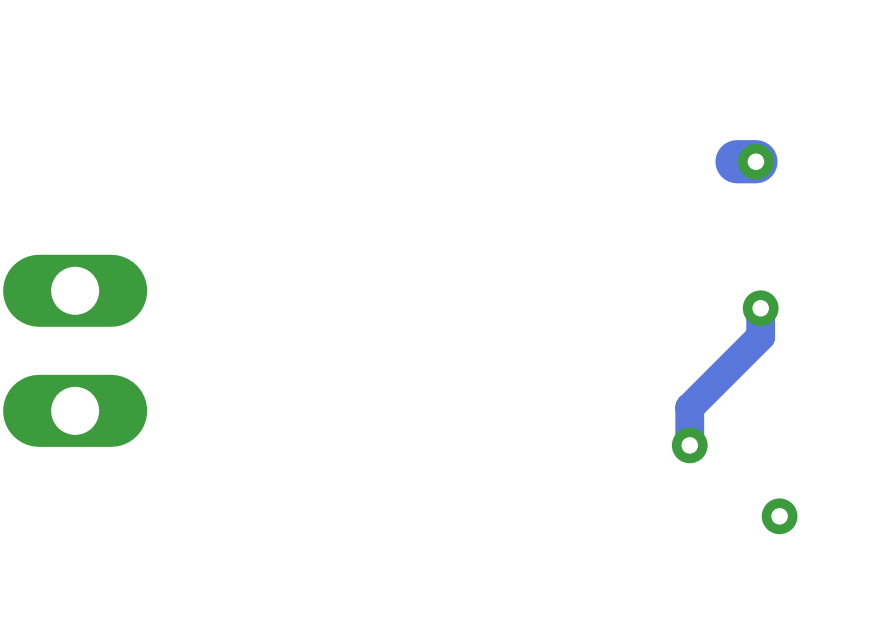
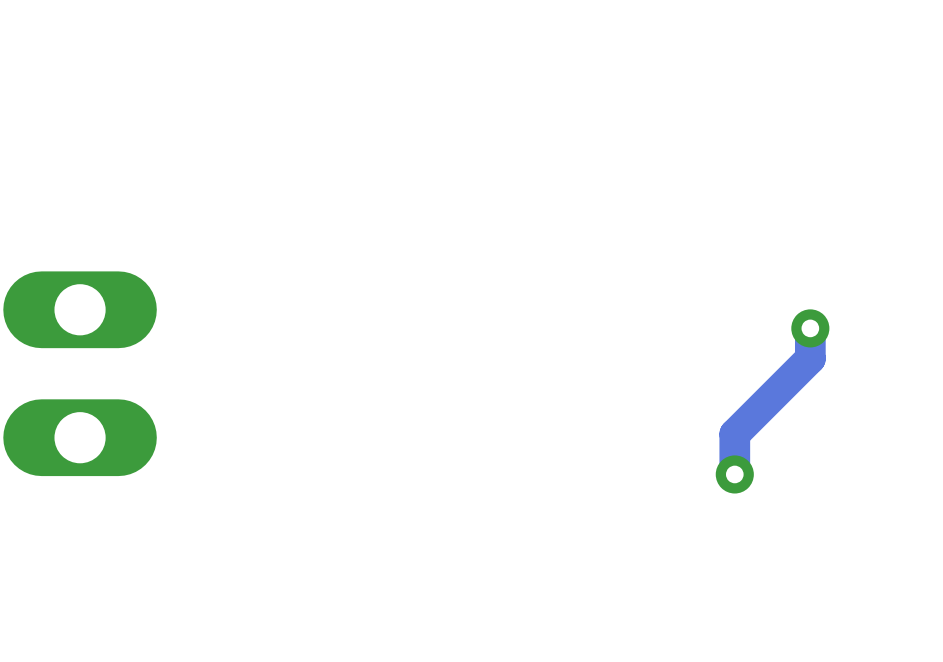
track: (755, 161) (737, 161) -> none
via: (755, 161) -> none
via: (779, 516) -> none

